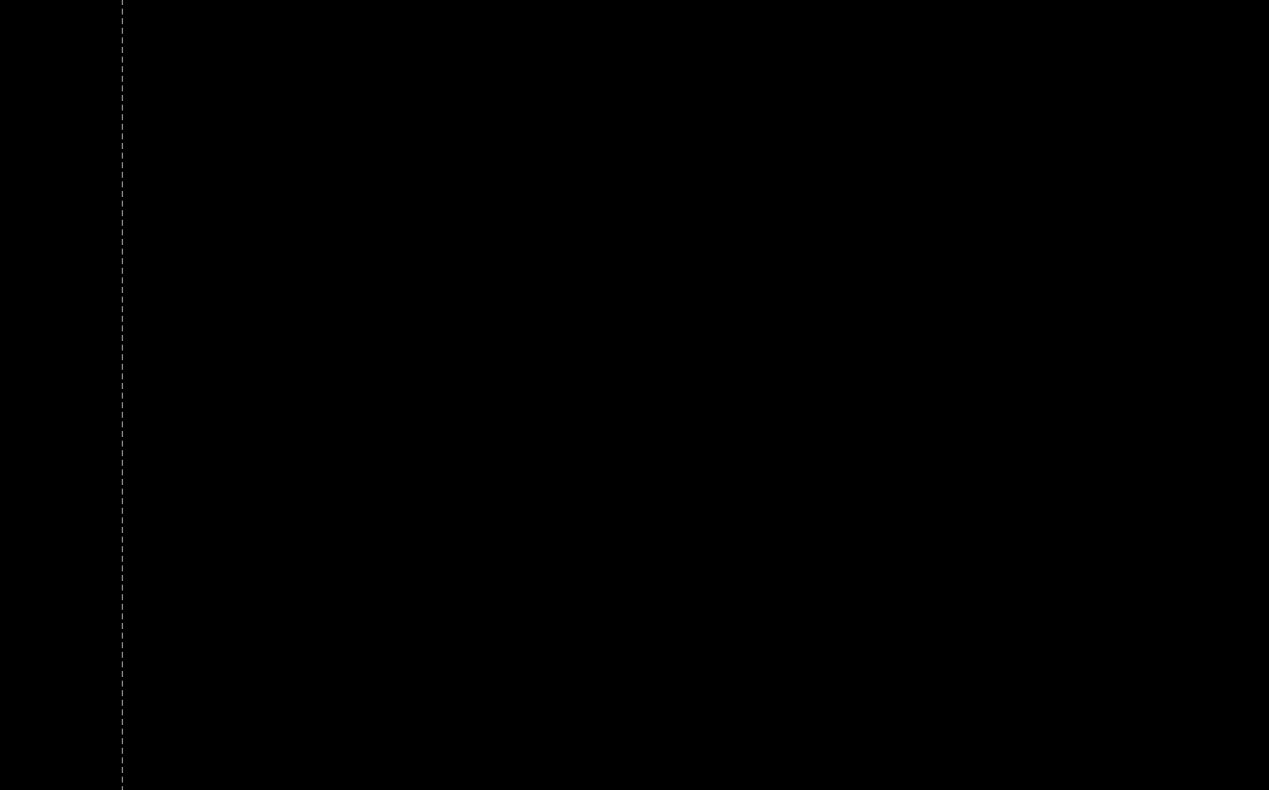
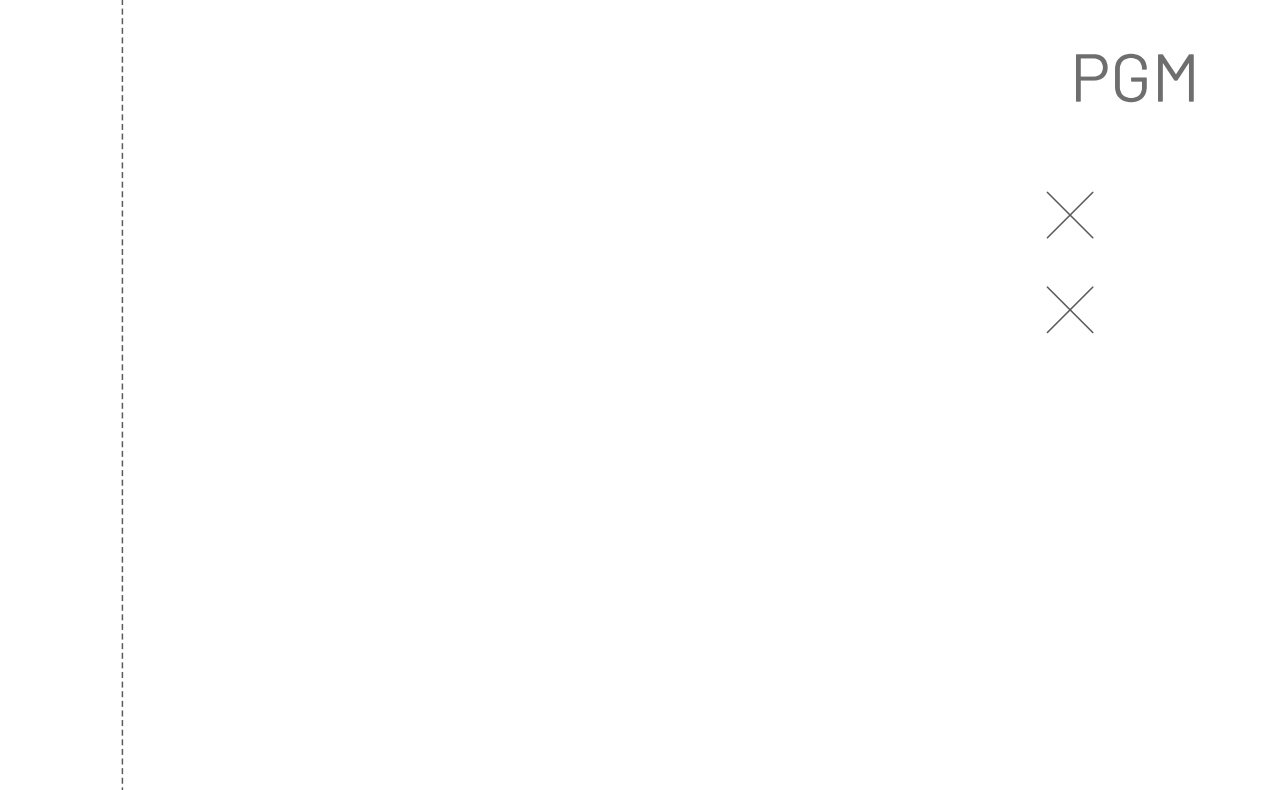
label: none -> PGM (1134, 78)
no-connect mark: none -> (1070, 215)
no-connect mark: none -> (1070, 309)

